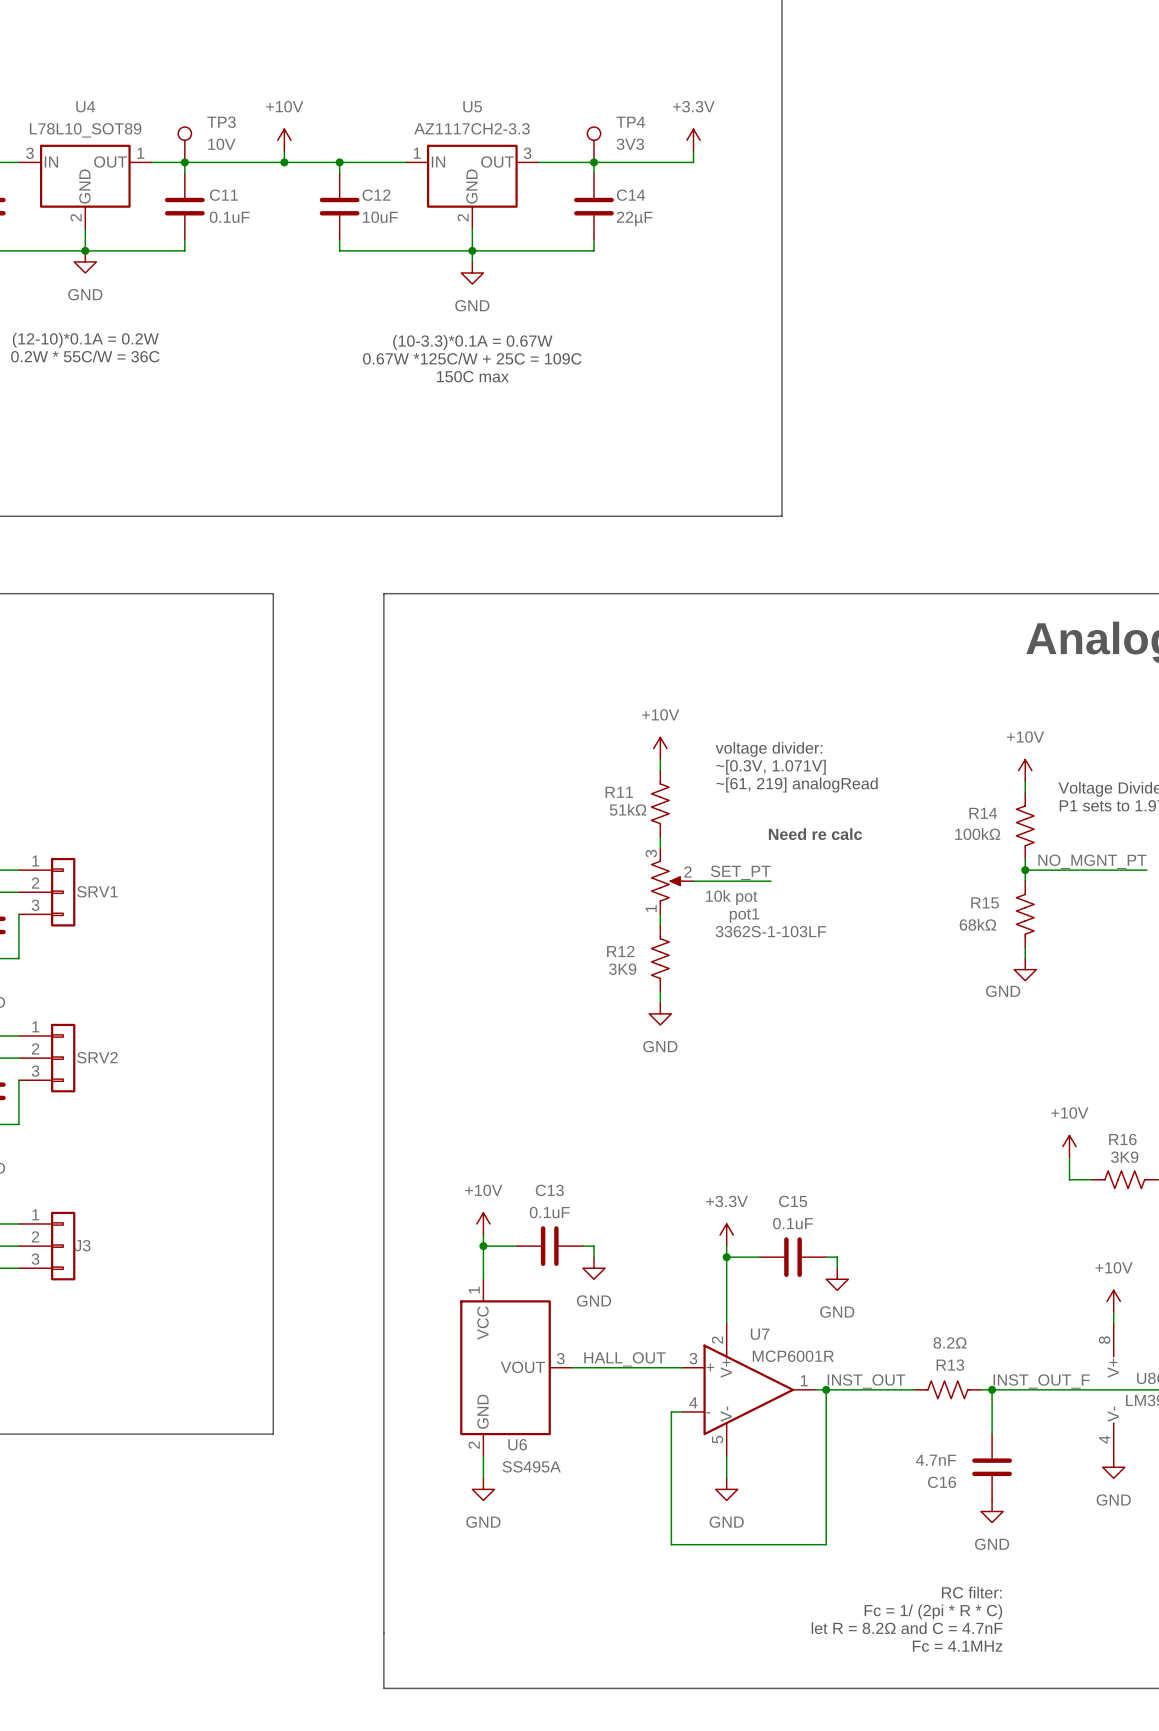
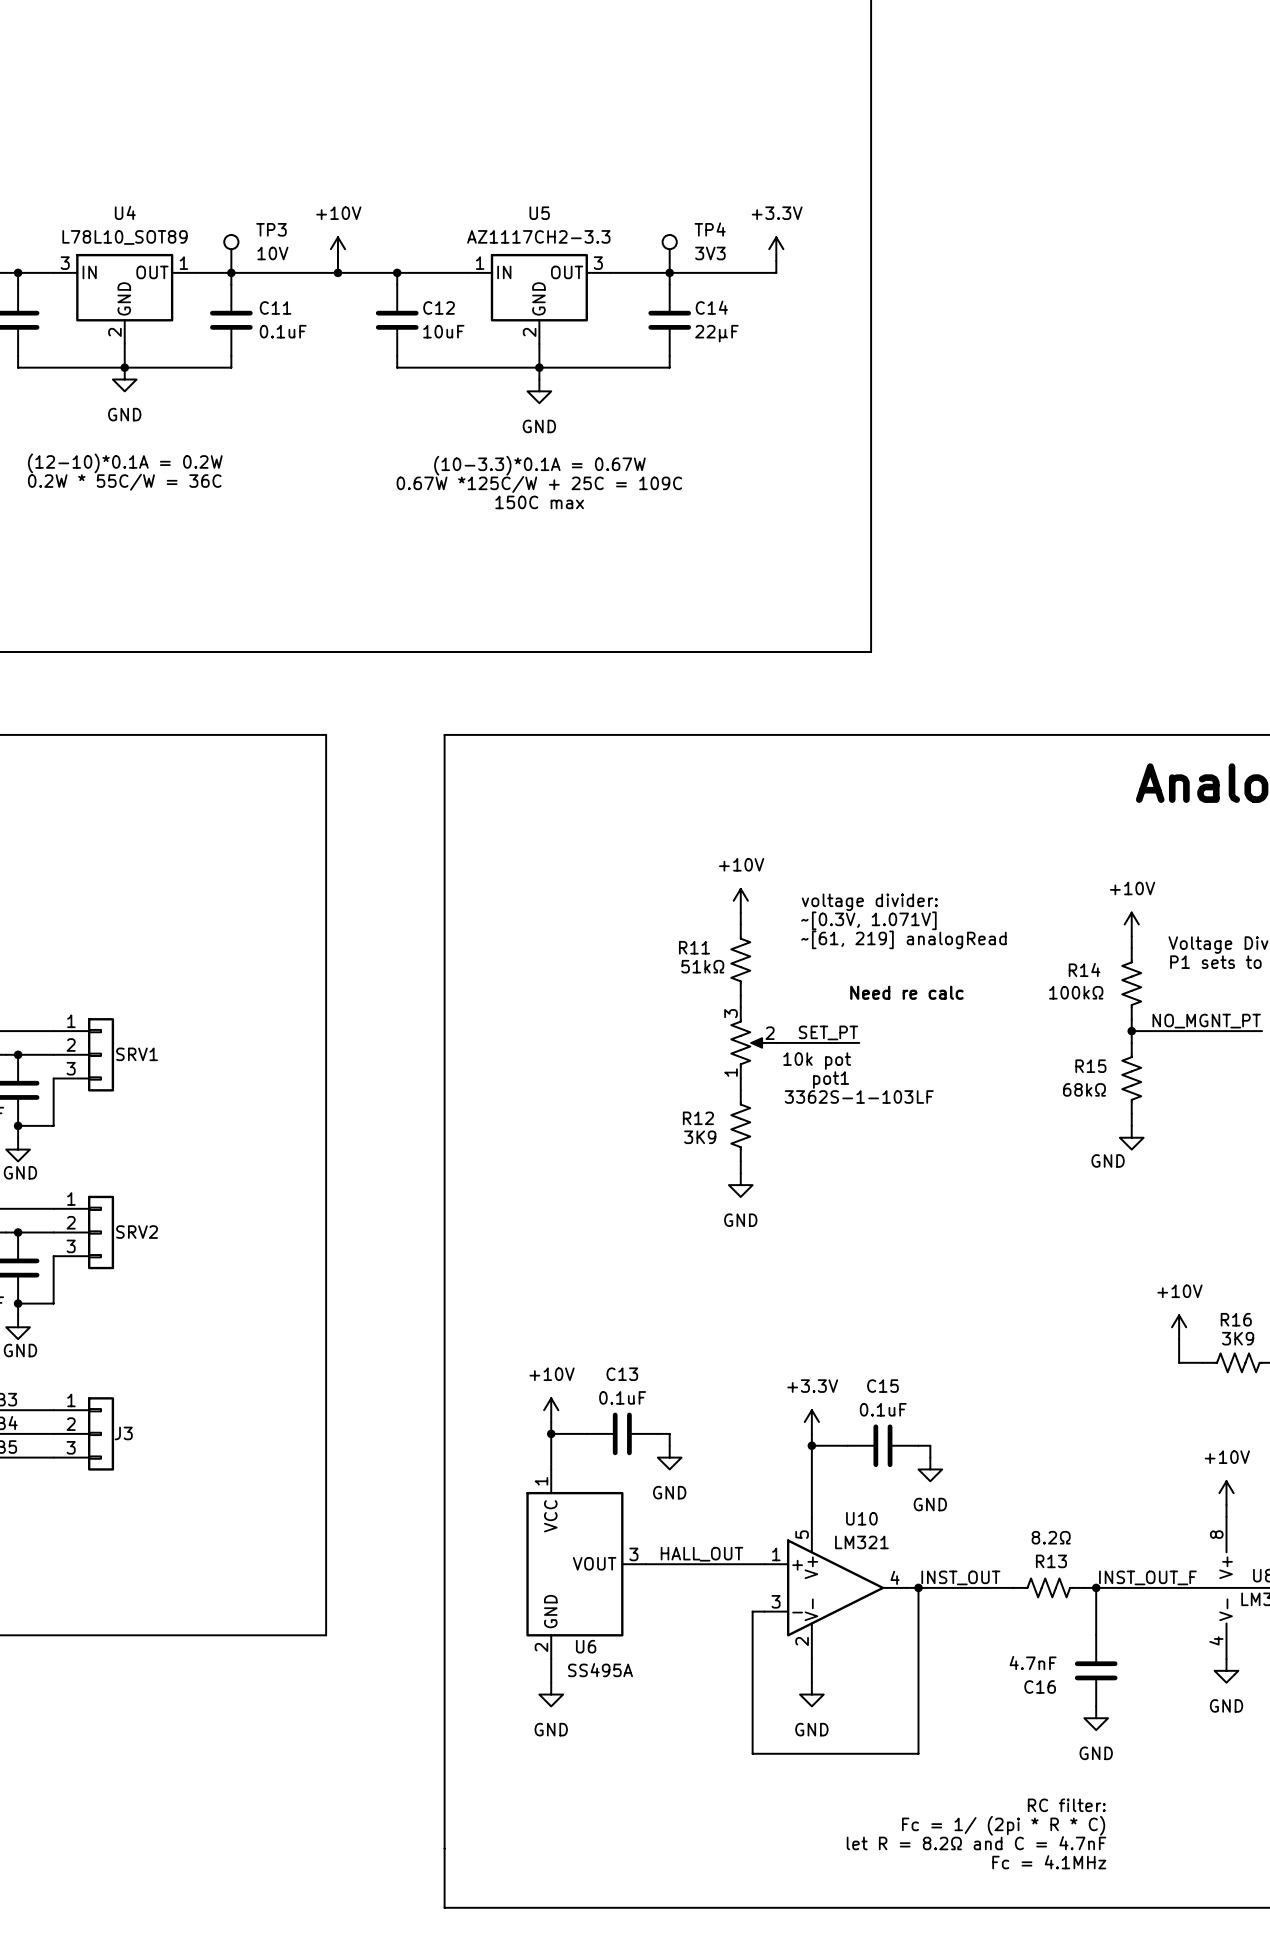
U7 name: U7 (760, 1334) -> U10 (861, 1518)
U7 pin number: 2 (717, 1340) -> 5 (802, 1534)
U7 value: MCP6001R (793, 1356) -> LM321 (861, 1542)
U7 pin number: 3 (693, 1358) -> 1 (776, 1554)
U7 pin number: 1 (804, 1380) -> 4 (895, 1577)
U7 pin number: 4 (693, 1402) -> 3 (776, 1601)
U7 pin number: 5 (717, 1439) -> 2 (802, 1641)

